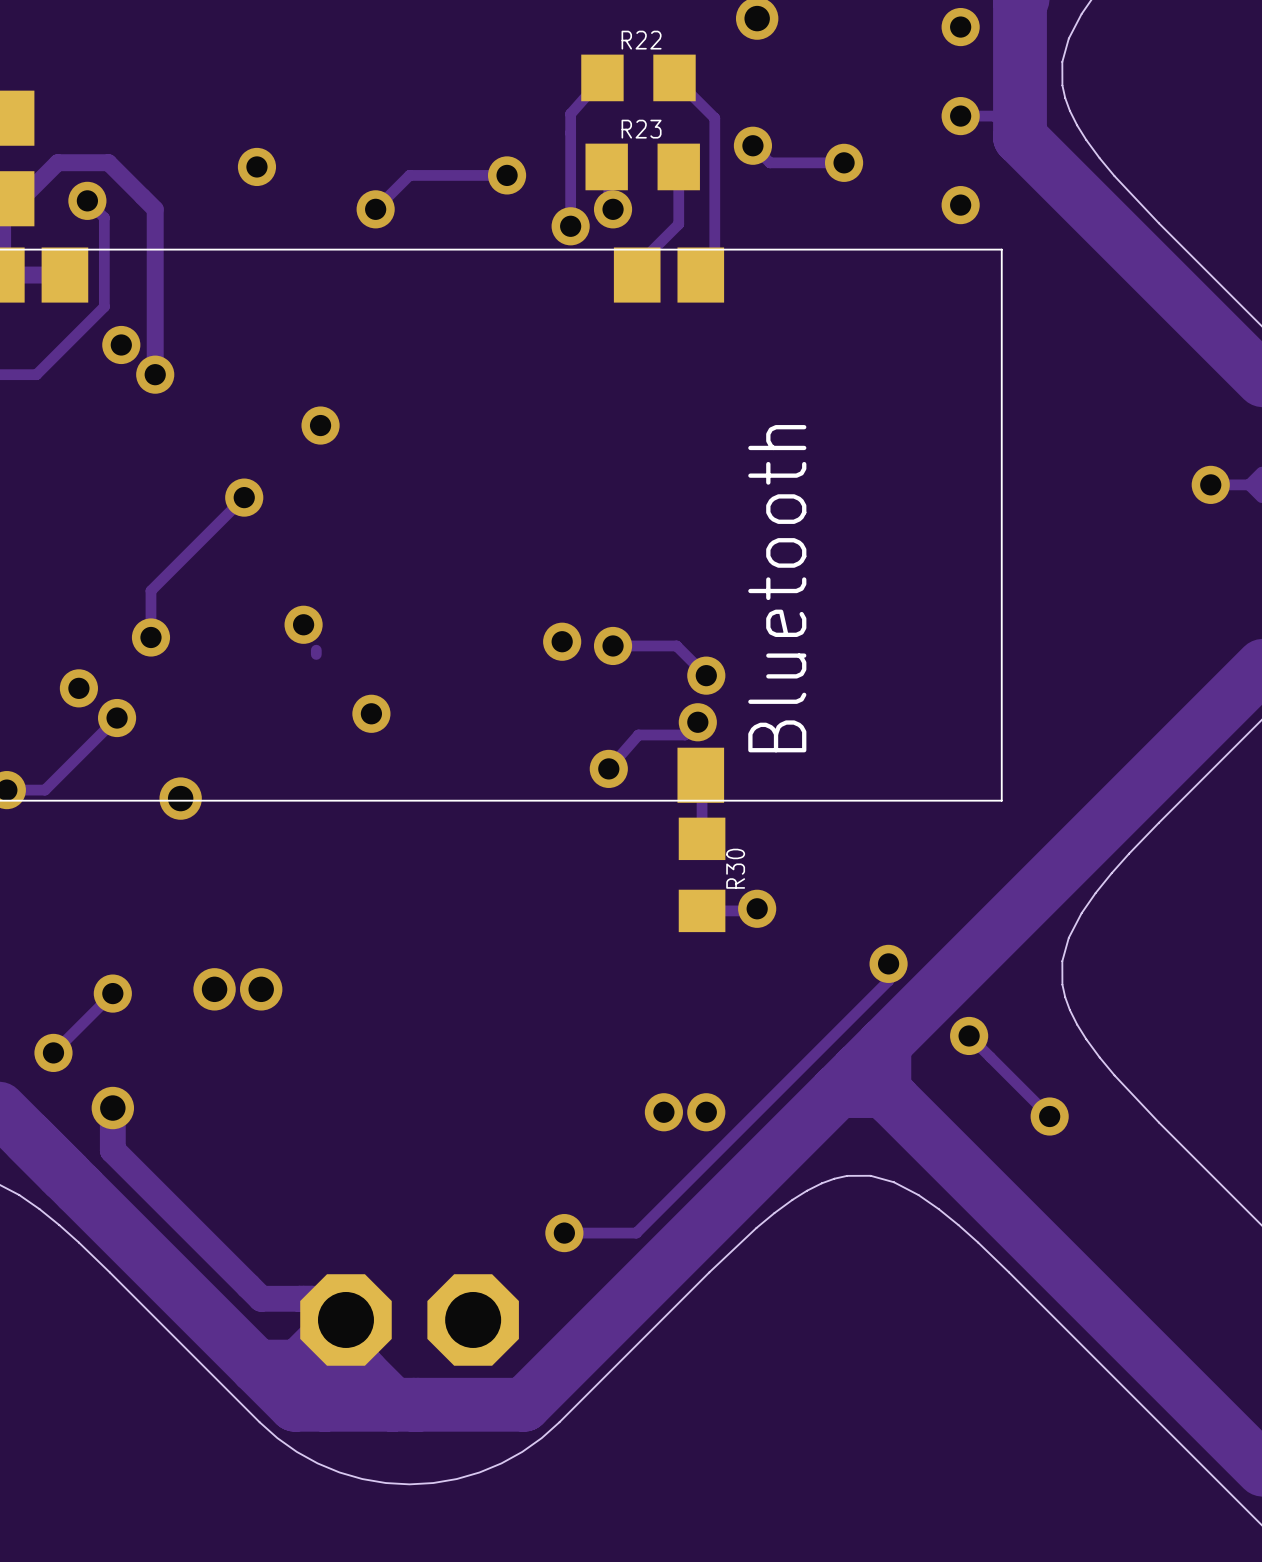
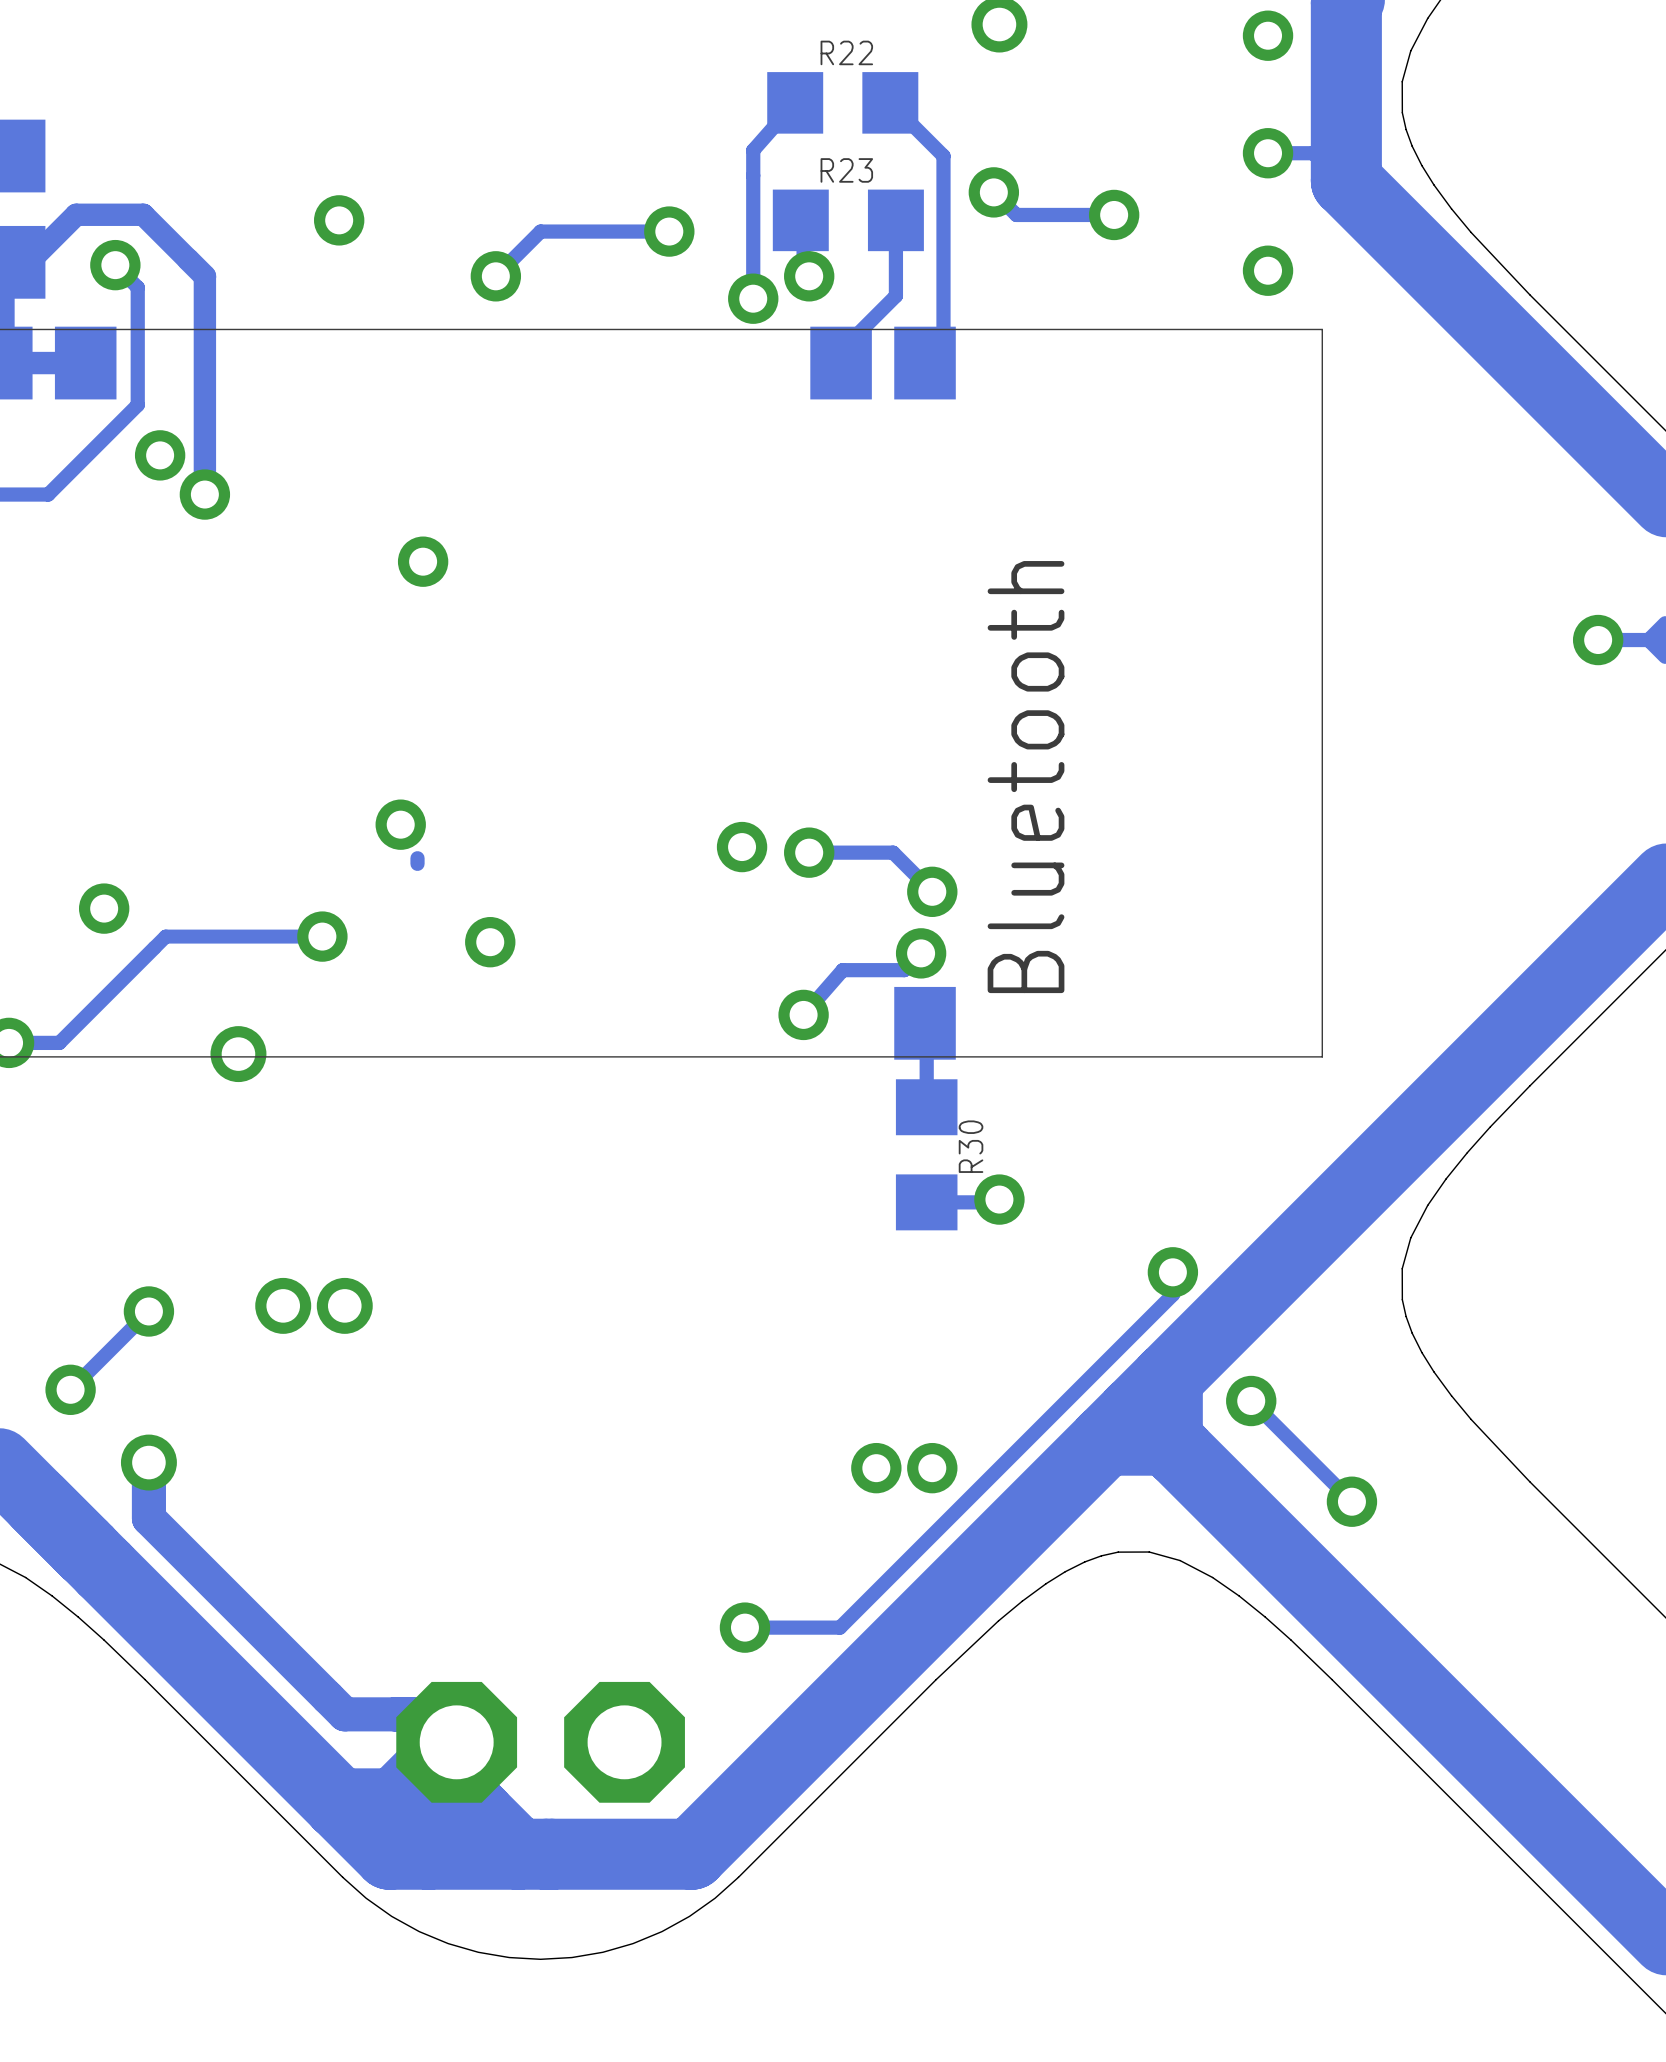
track: (244, 497) (150, 590) (150, 637) -> none
via: (244, 497) -> none
via: (150, 637) -> none
track: none -> (322, 936) (165, 936) (154, 947)
via: none -> (322, 936)
via: (117, 718) -> none
track: (969, 1035) (1049, 1116) -> none
via position: (969, 1035) -> (1251, 1401)
track: none -> (1251, 1401) (1351, 1501)
via position: (1049, 1116) -> (1351, 1501)

